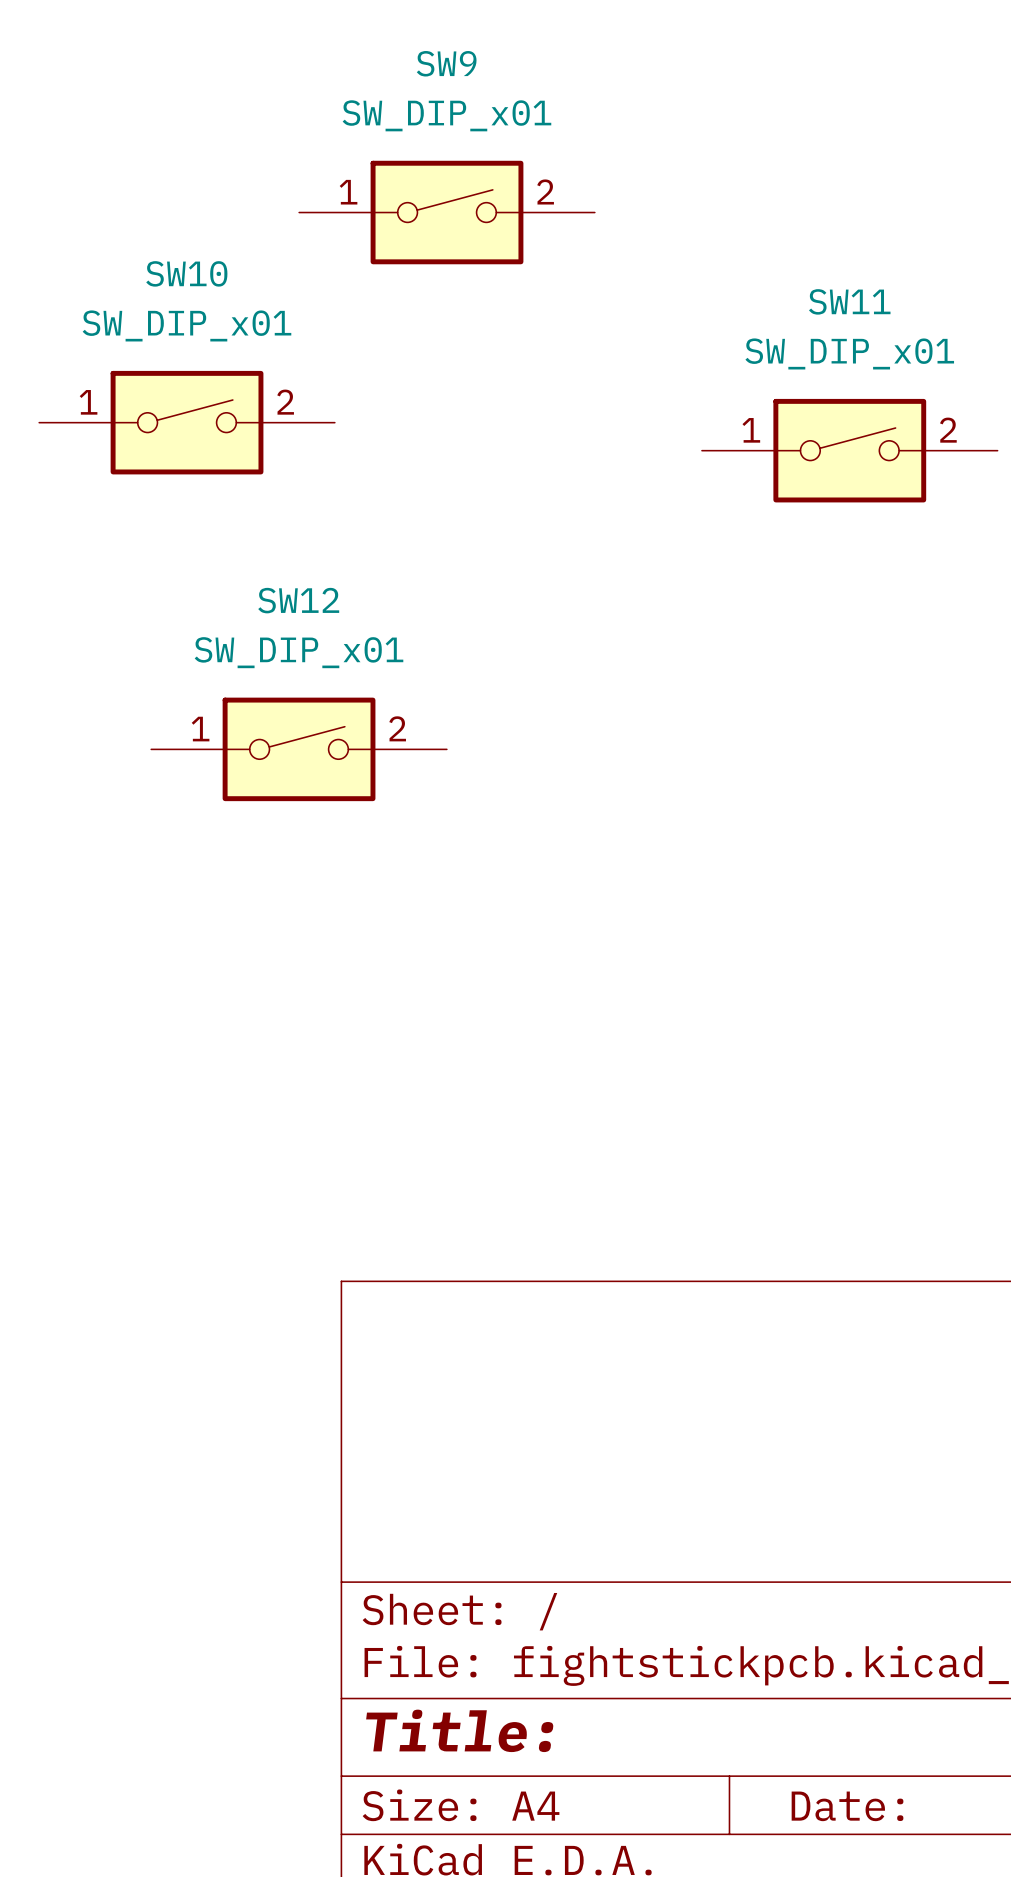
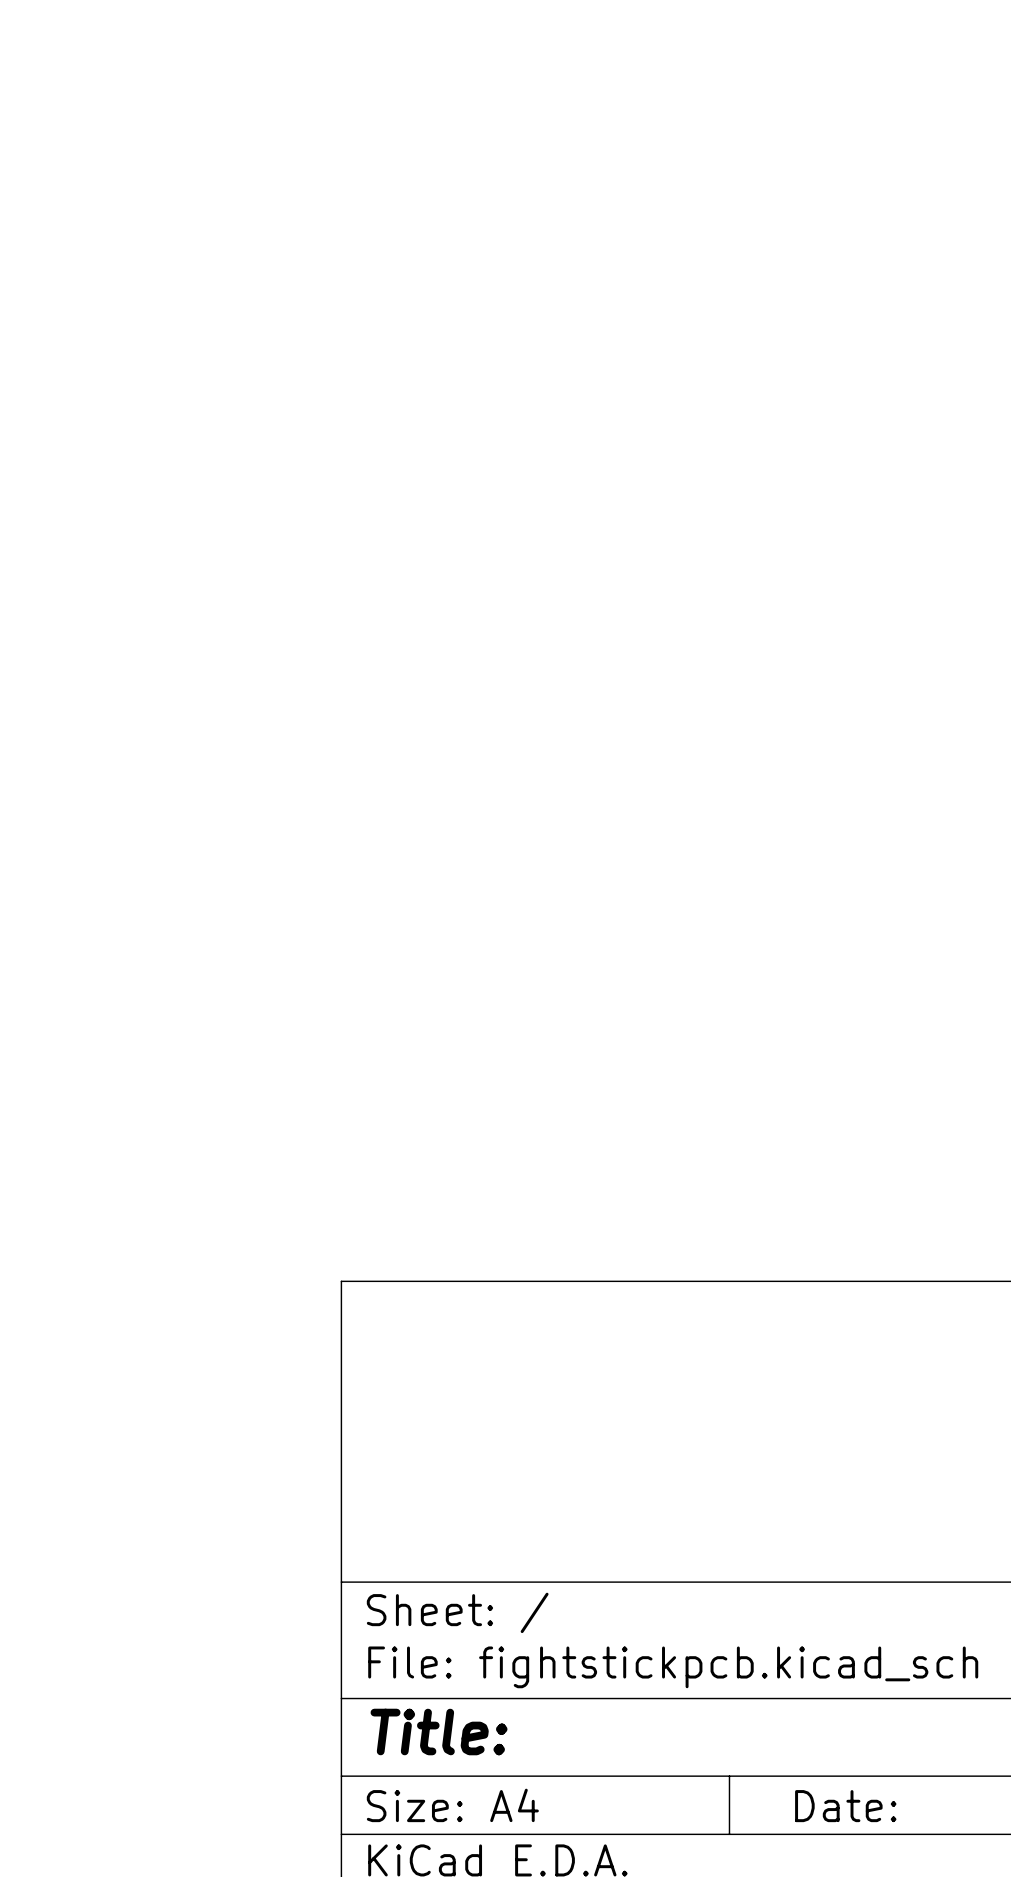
SW9: SW_DIP_x01 (447, 212) -> none
SW10: SW_DIP_x01 (187, 422) -> none
SW11: SW_DIP_x01 (849, 450) -> none
SW12: SW_DIP_x01 (299, 749) -> none

